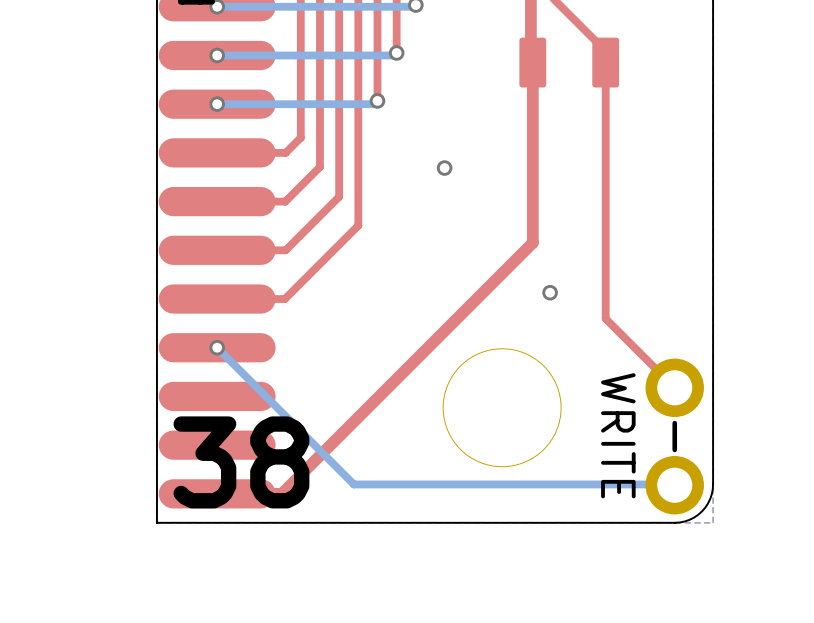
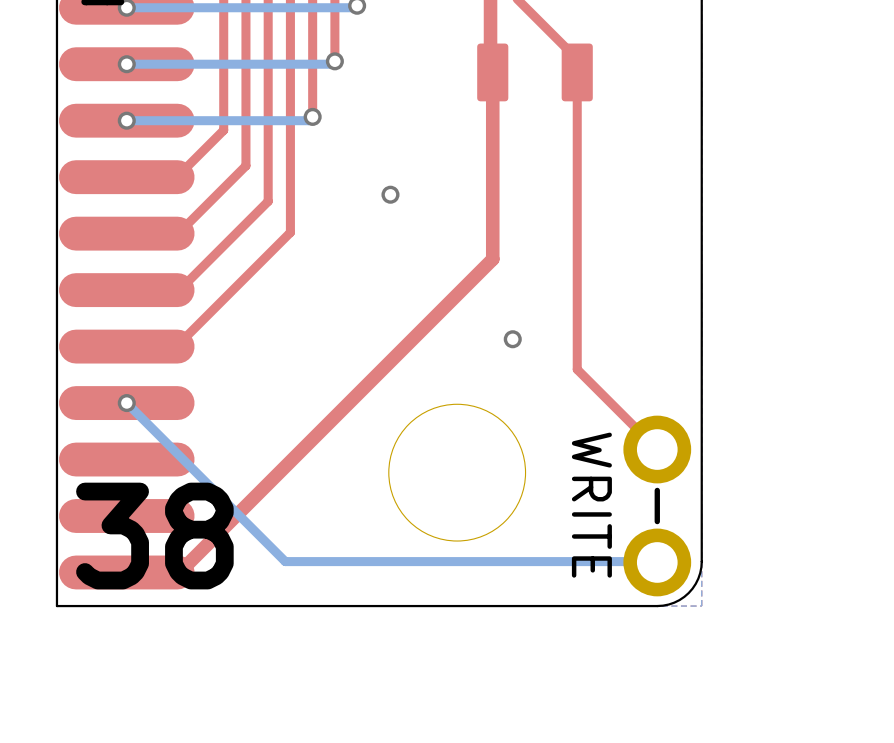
top track: (300, 112) (300, 137) (285, 152) (260, 152) -> (223, 130) (176, 177)
top track: (319, 143) (319, 166) (285, 201) (261, 201) -> (245, 165) (178, 233)
top track: (339, 173) (339, 196) (285, 250) (262, 250) -> (268, 201) (179, 290)
top track: (358, 200) (358, 225) (284, 299) (259, 299) -> (290, 232) (176, 346)
top track: (532, 223) (532, 242) (281, 493) (262, 493) -> (492, 259) (179, 572)

